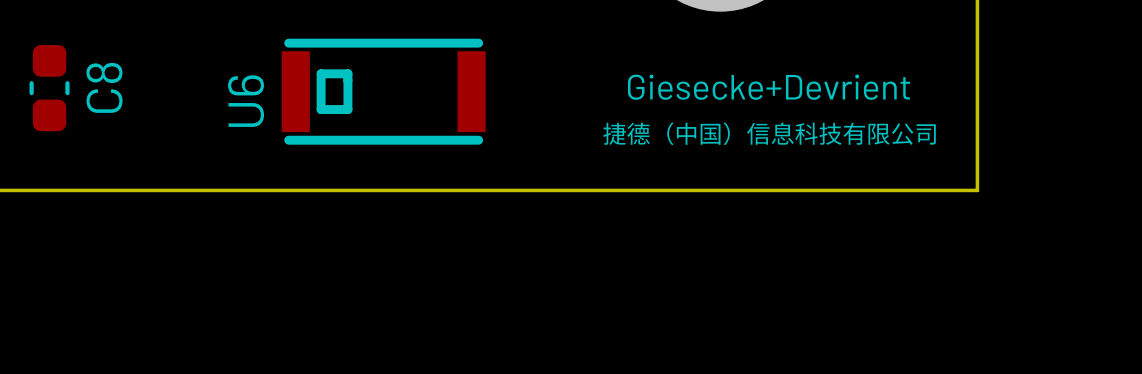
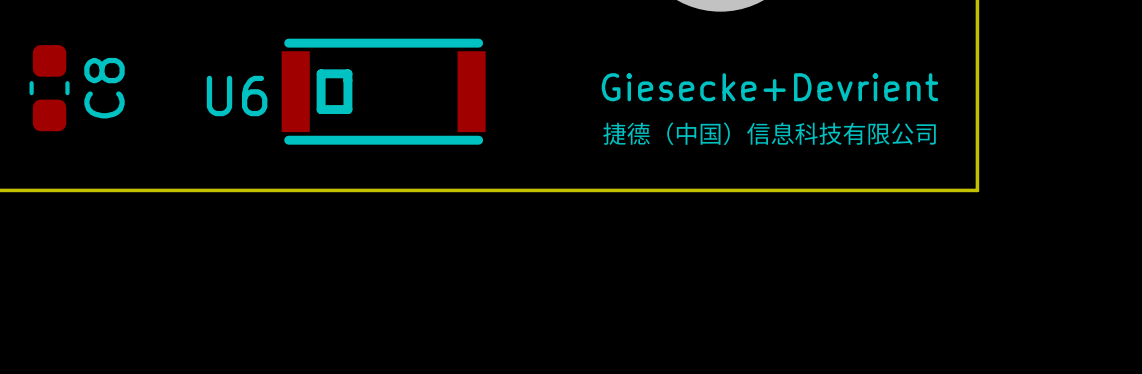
U6 name rotation: 0° (246, 101) -> 90° clockwise (237, 95)

